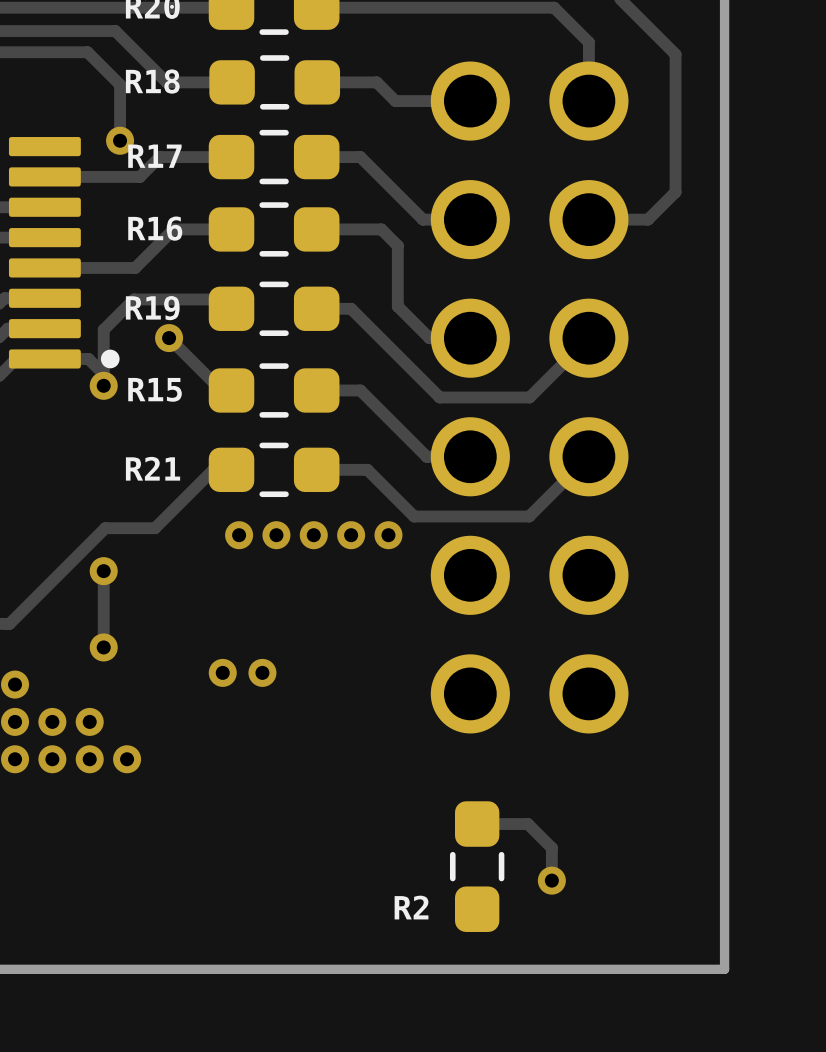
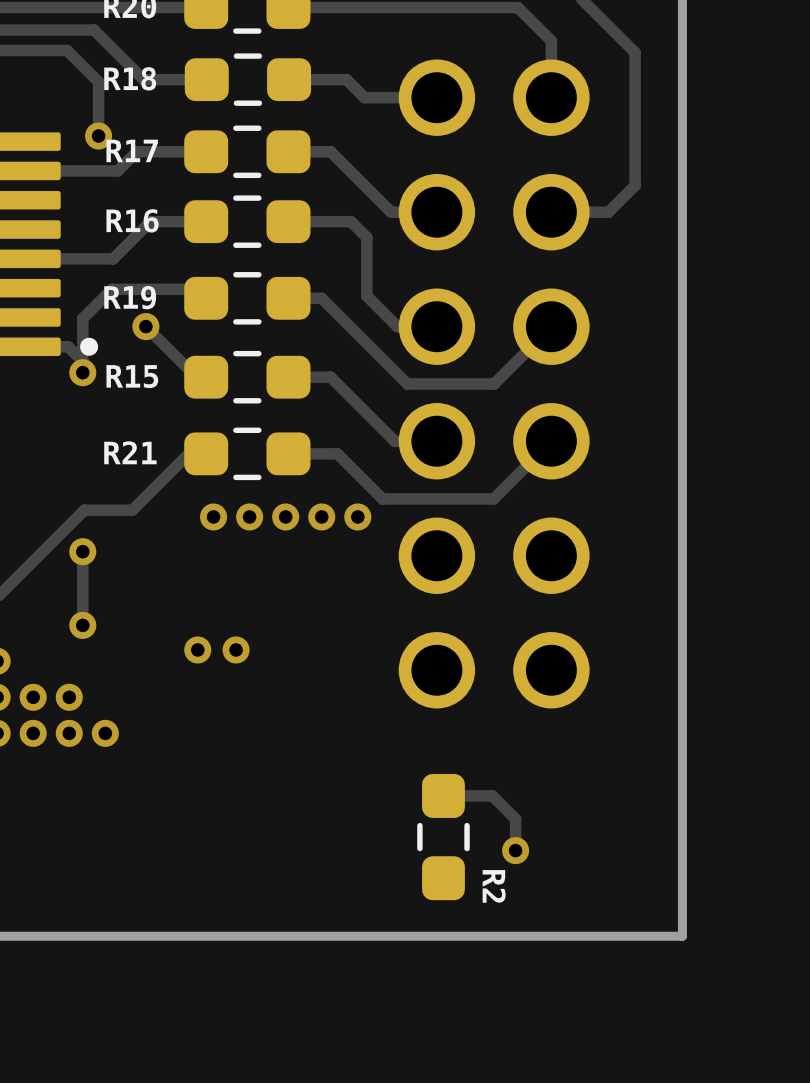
R2 name rotation: 0° (411, 907) -> 90° clockwise (494, 886)
R2 name position: R2 (411, 907) -> R2 (494, 886)

